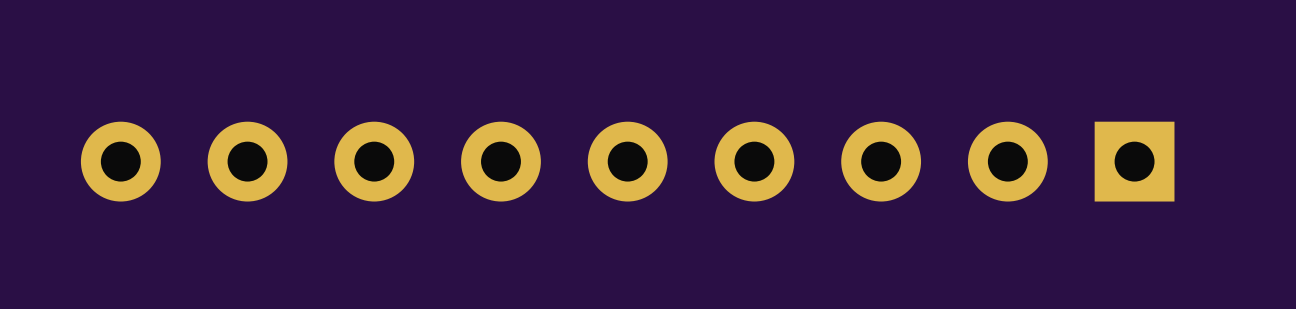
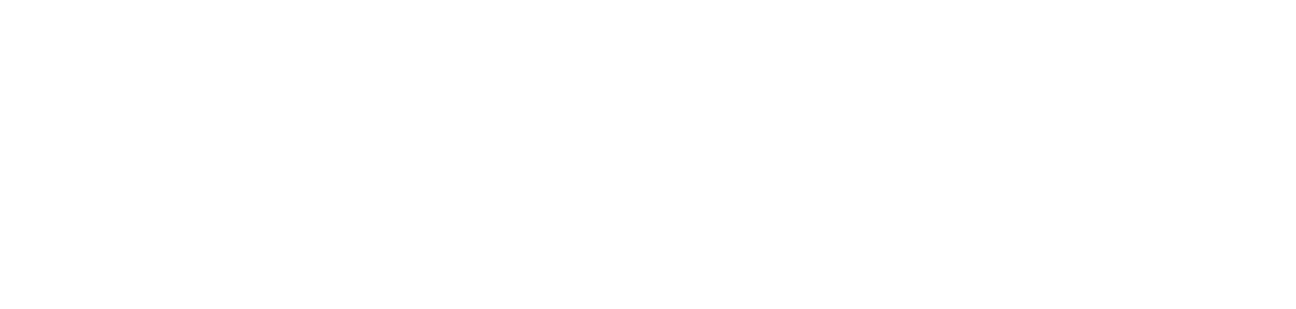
part: (627, 161) -> none

